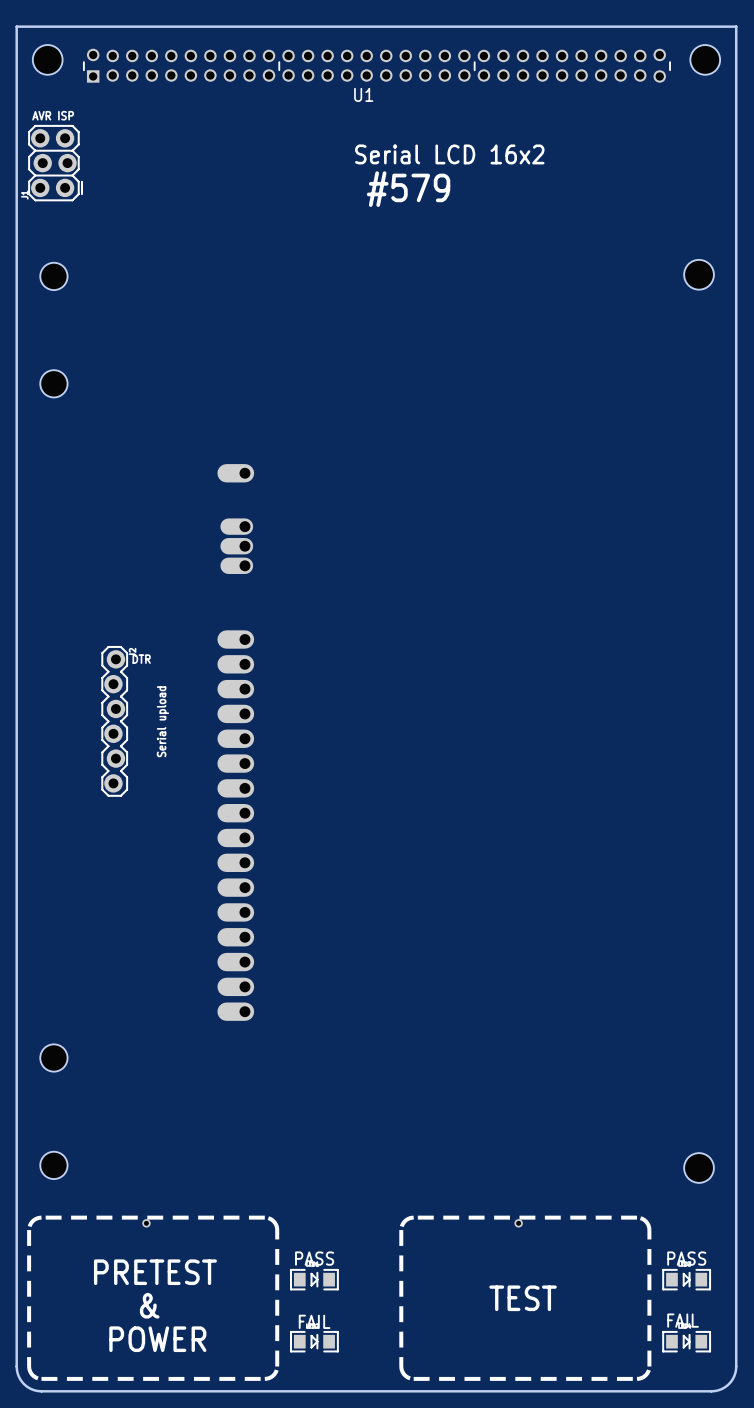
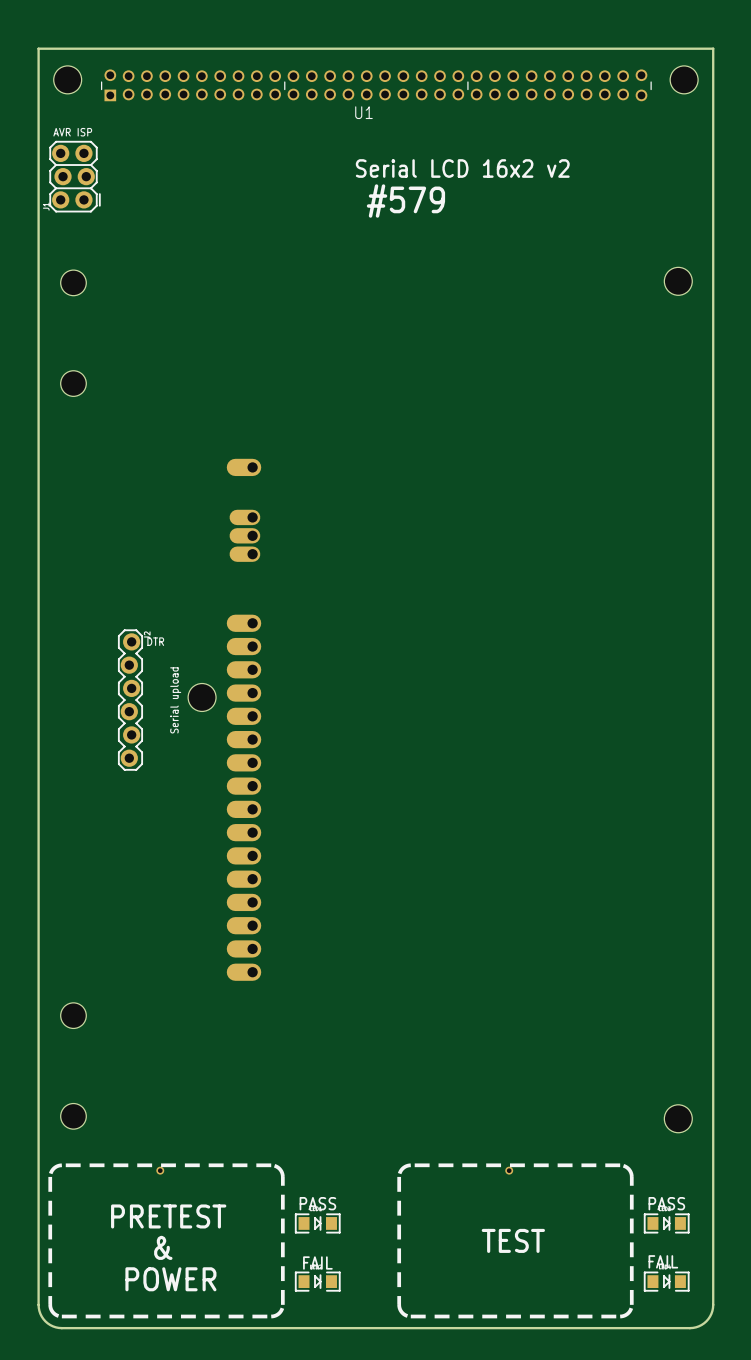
text: Serial LCD 16x2 (449, 154) -> Serial LCD 16x2 v2 (462, 168)
part: none -> (202, 697)

